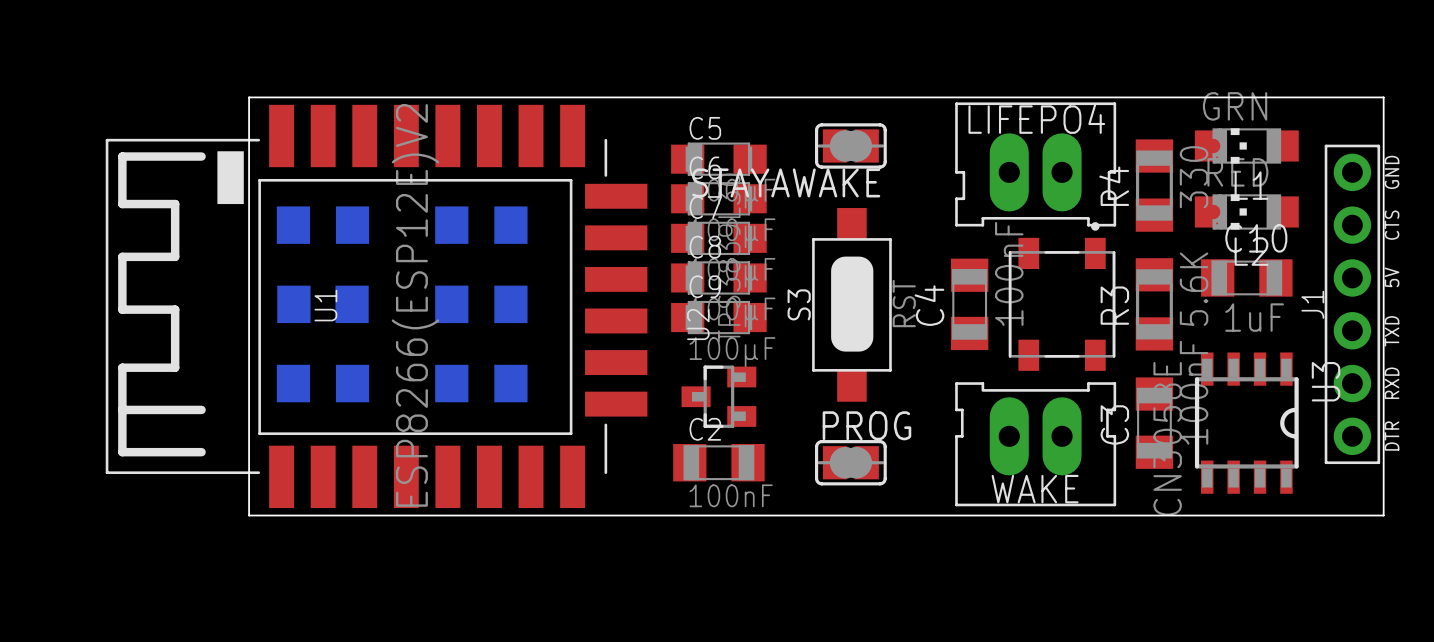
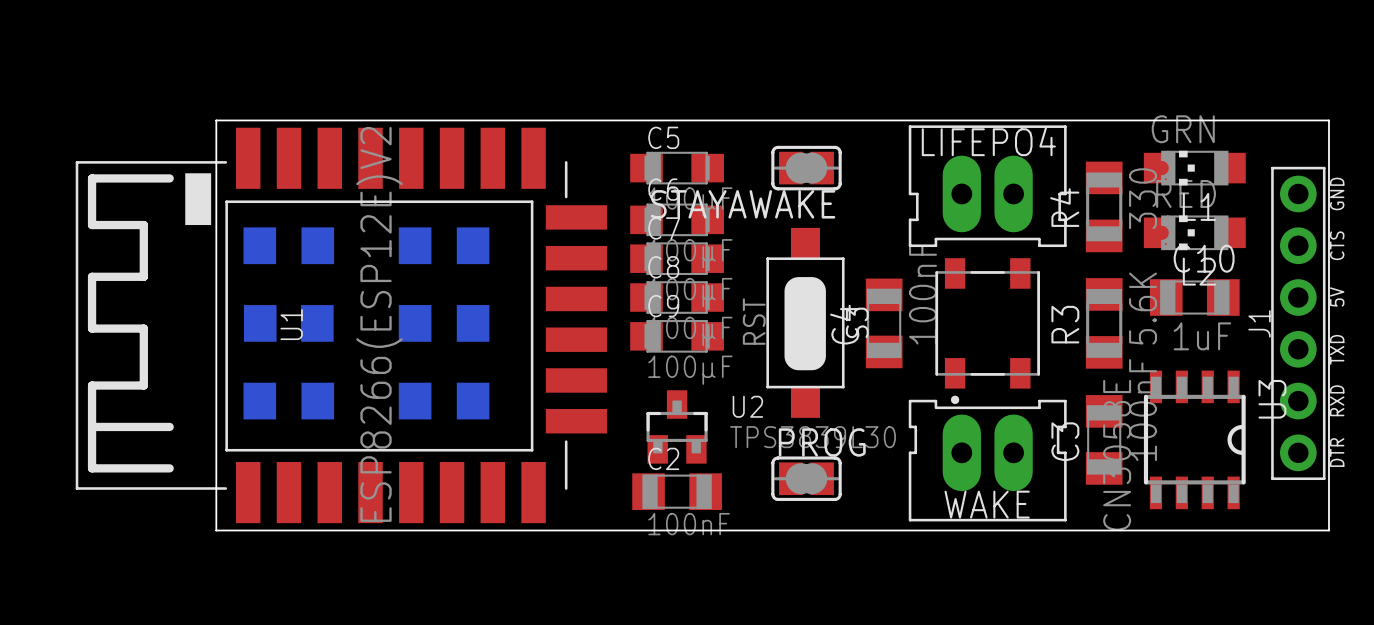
C5 position: (718, 159) -> (677, 168)
part rotation: 0° (1062, 296) -> 180° (987, 331)
S3 rotation: 0° (851, 304) -> 180° (805, 322)
C4 position: (969, 304) -> (884, 323)
U2 rotation: 0° (718, 396) -> 90° clockwise (677, 426)
C2 position: (718, 462) -> (677, 491)

